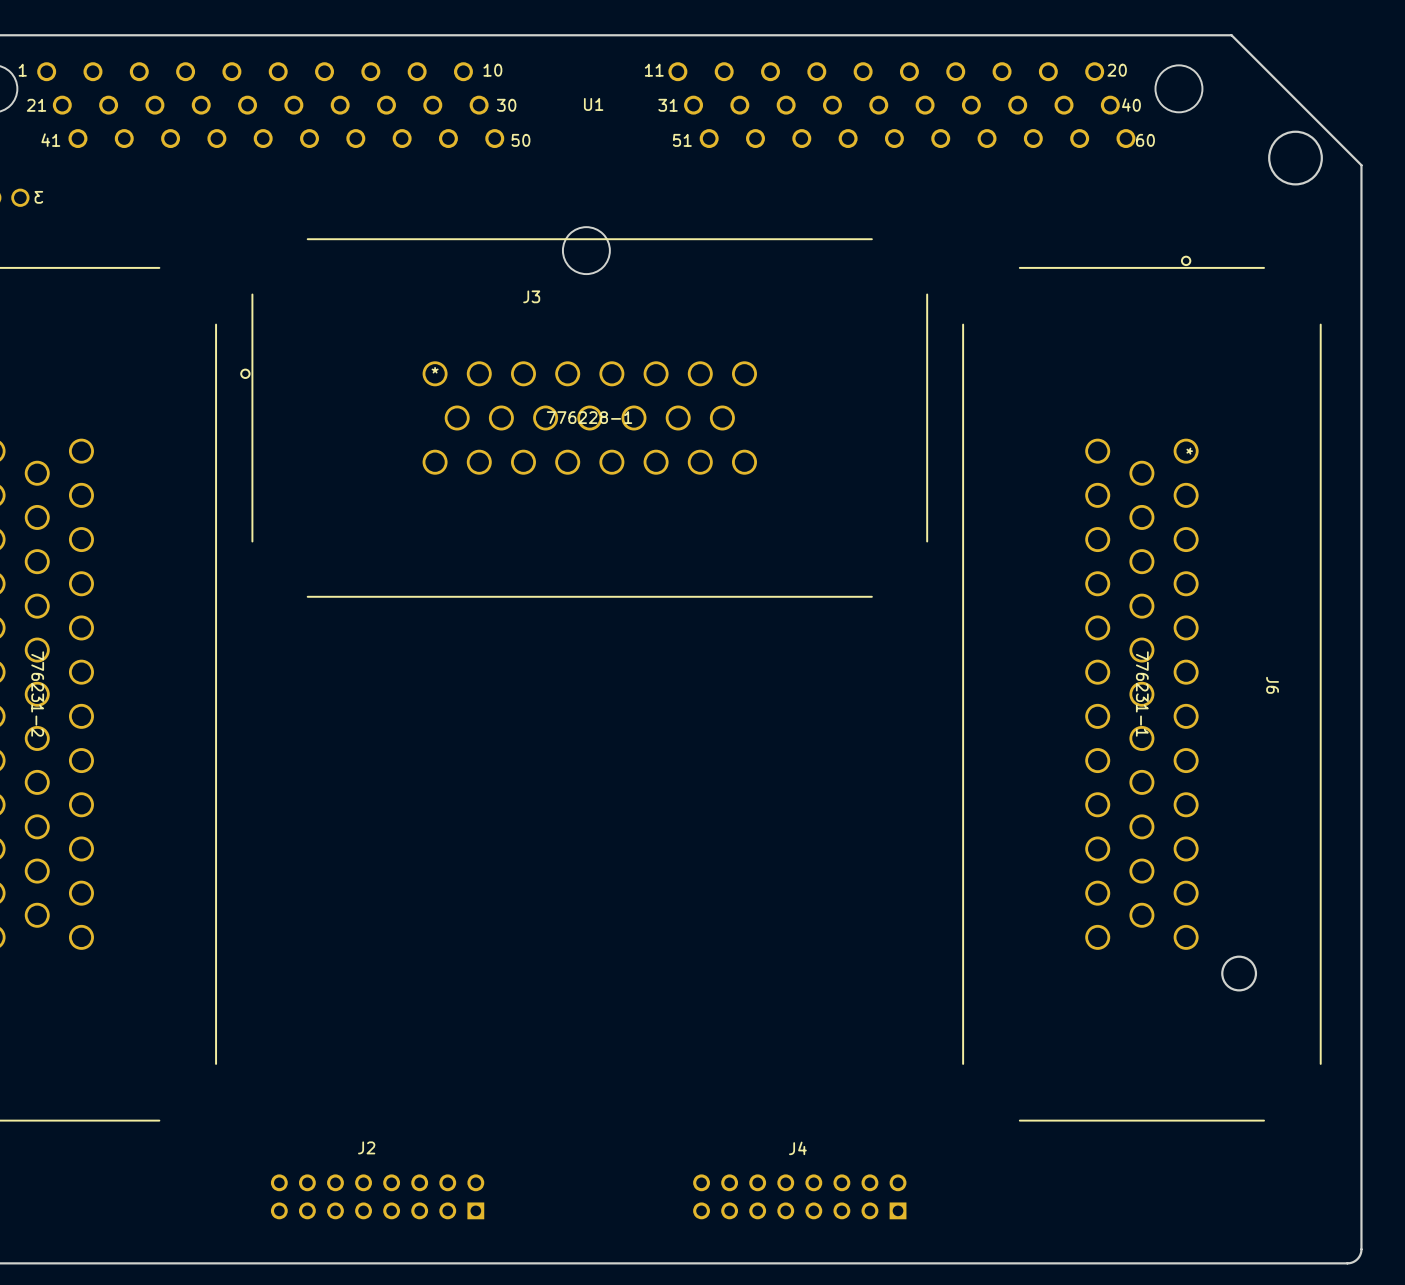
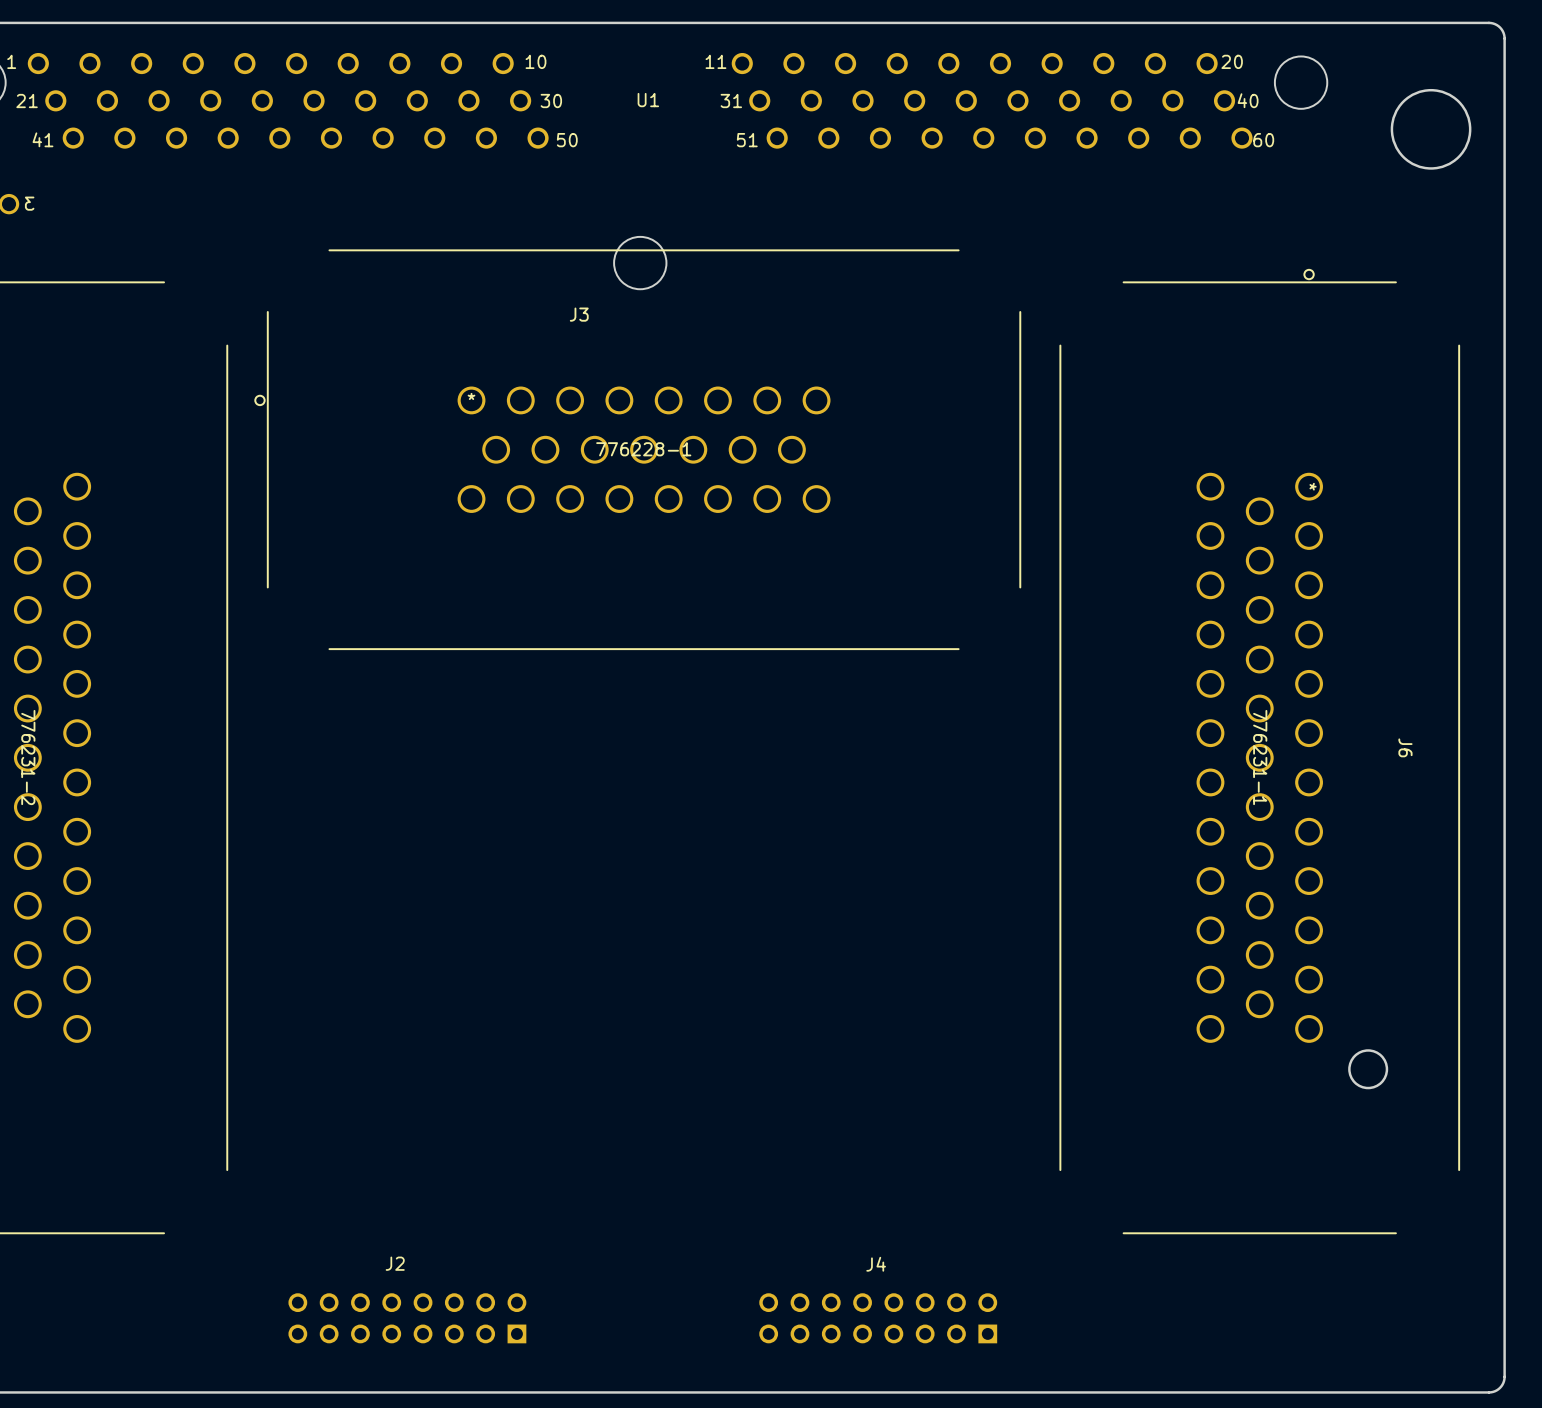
board edge: (1231, 35) (1361, 165) -> (1359, 22) (1491, 23) (1501, 29) (1504, 38)
board edge: none -> (1504, 38) (1504, 167)
round board edge: none -> [1390, 88, 1472, 170]
round board edge: [1268, 130, 1323, 186] -> none

